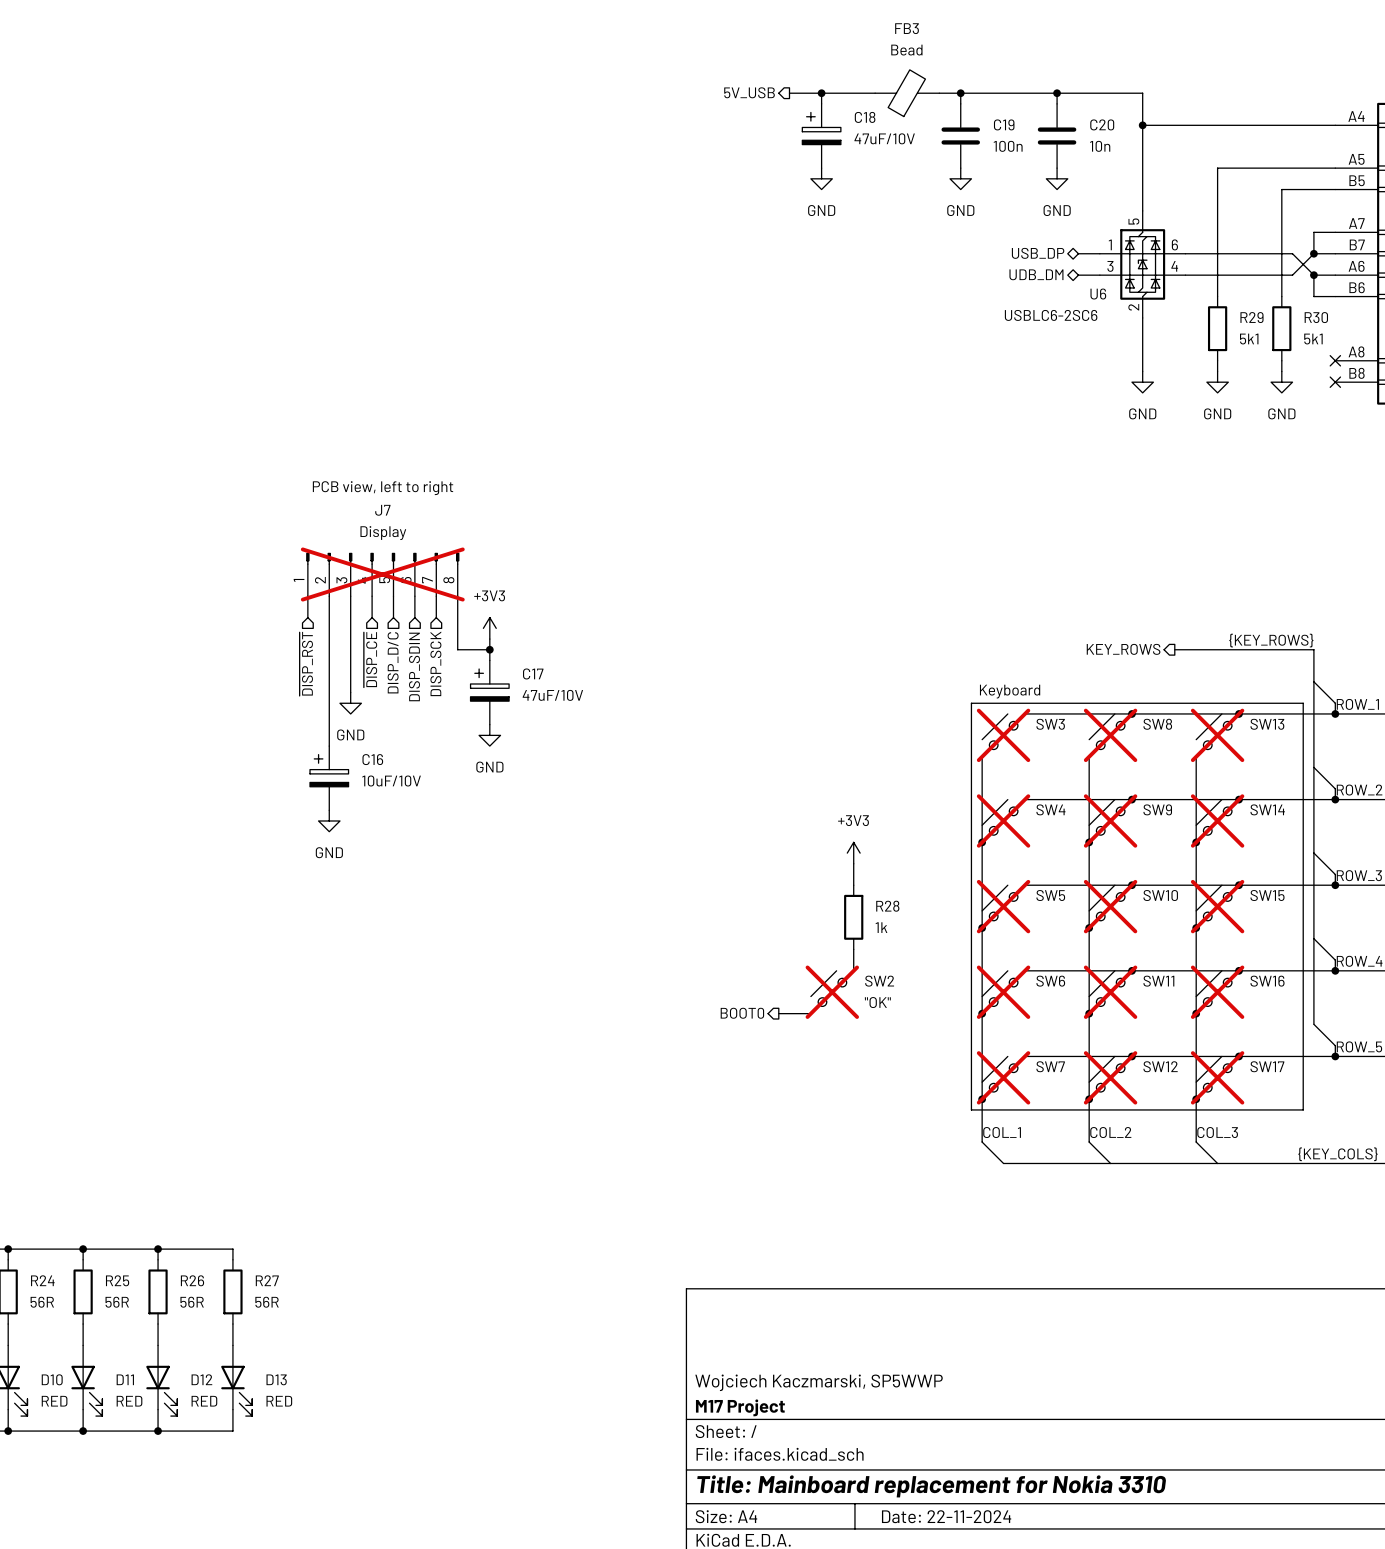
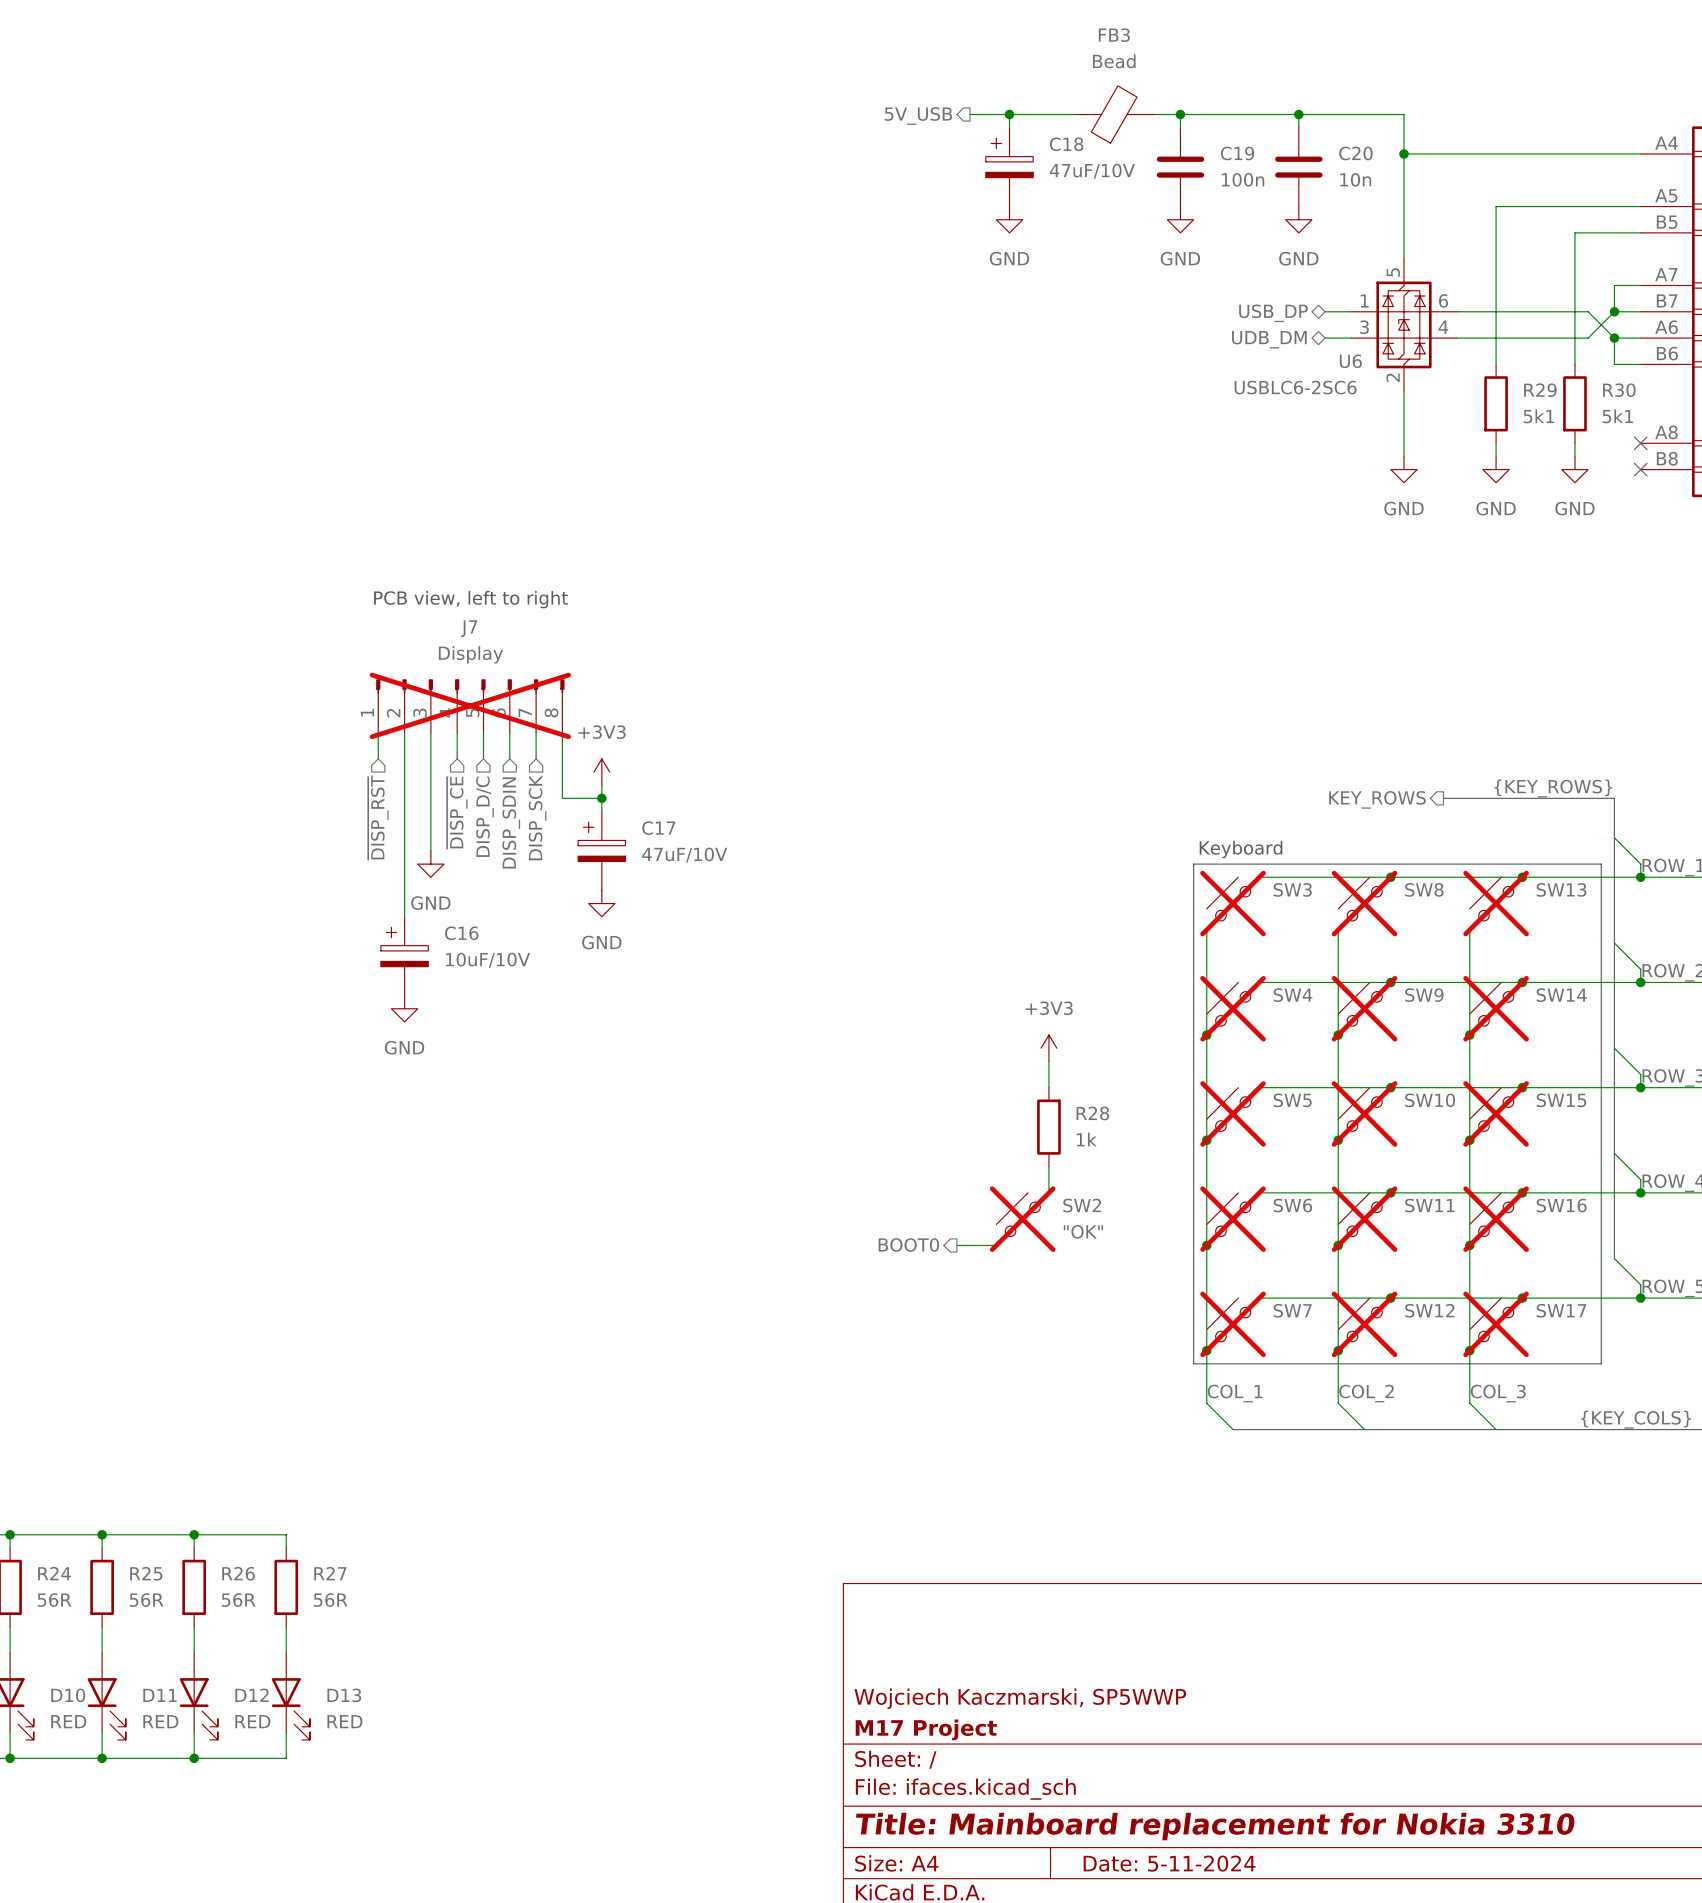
title block: Date: 22-11-2024 (946, 1516) -> Date: 5-11-2024 (1169, 1863)

